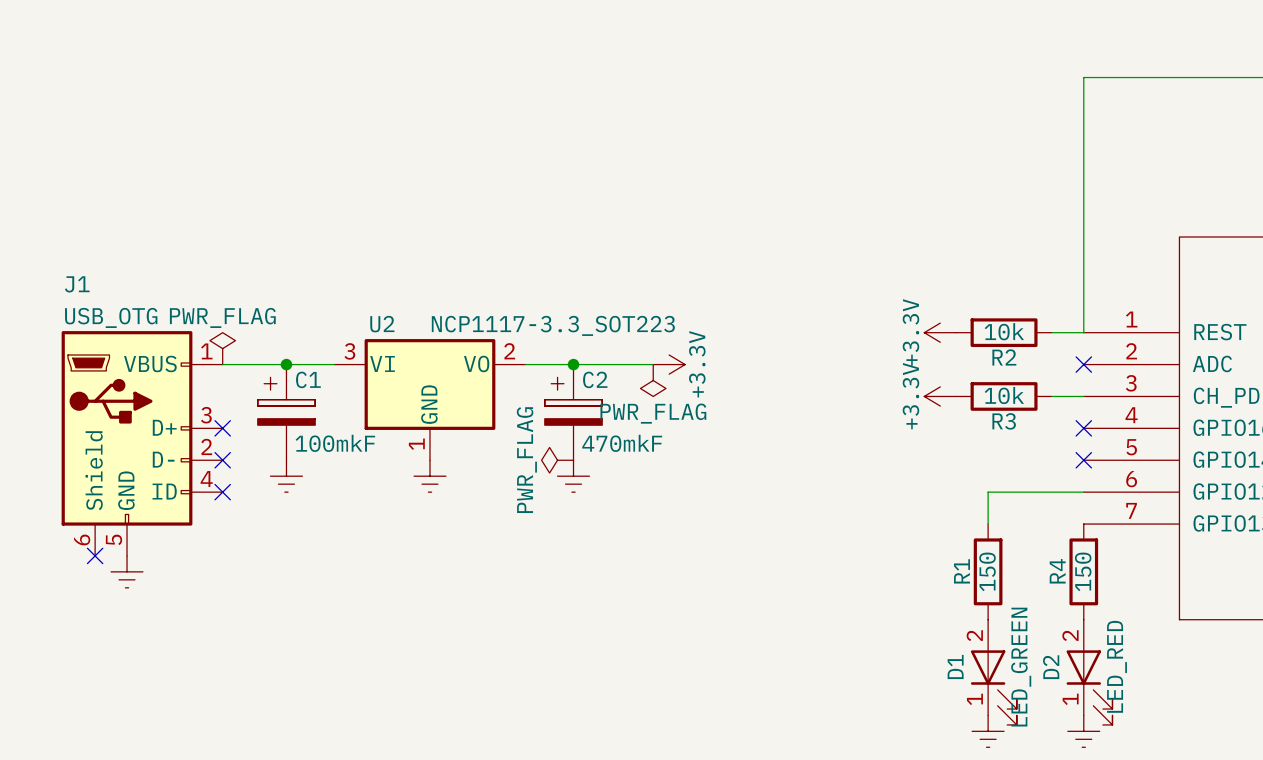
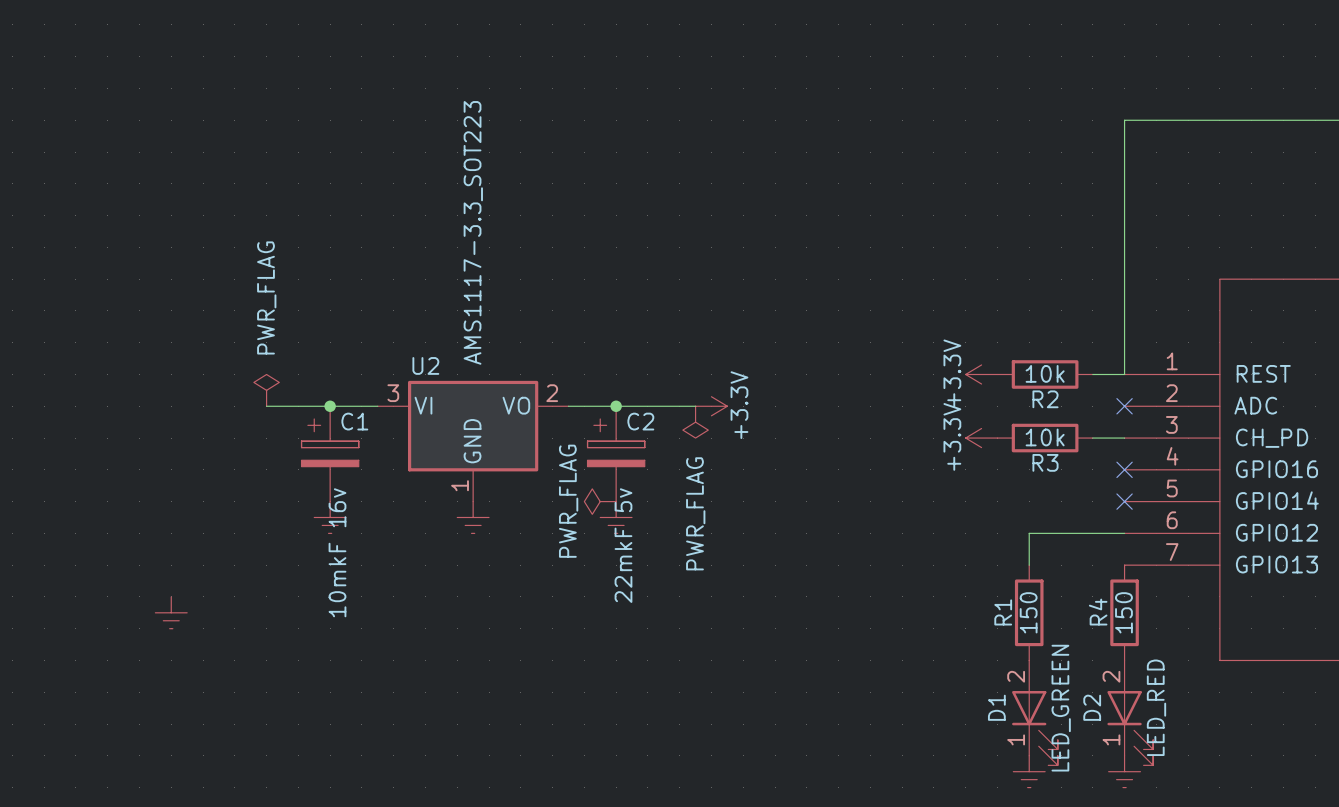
power symbol text rotation: 0° (222, 317) -> 90° counterclockwise (266, 297)
U2 value: NCP1117-3.3_SOT223 (553, 325) -> AMS1117-3.3_SOT223 (473, 232)
power symbol text rotation: 0° (653, 413) -> 90° counterclockwise (695, 513)
no-connect mark: (222, 428) -> none
J1: USB_OTG (142, 443) -> none
C1 value: 100mkF (335, 443) -> 10mkF 16v (337, 552)
C2 value: 470mkF (622, 443) -> 22mkF 5v (623, 545)
no-connect mark: (222, 460) -> none
no-connect mark: (222, 492) -> none
no-connect mark: (95, 555) -> none

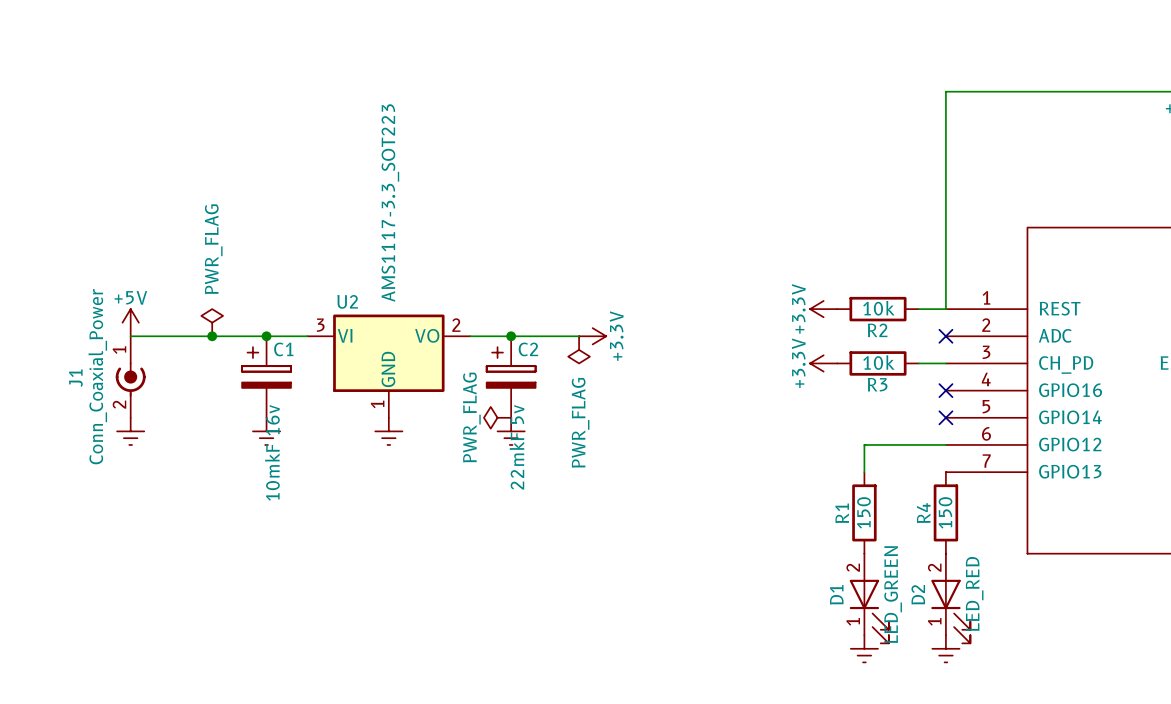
power symbol: none -> +5V (130, 322)
wire: none -> (130, 336) (212, 336)
junction: none -> (212, 336)
J1: none -> Conn_Coaxial_Power (130, 377)
power symbol position: (171, 612) -> (130, 431)

